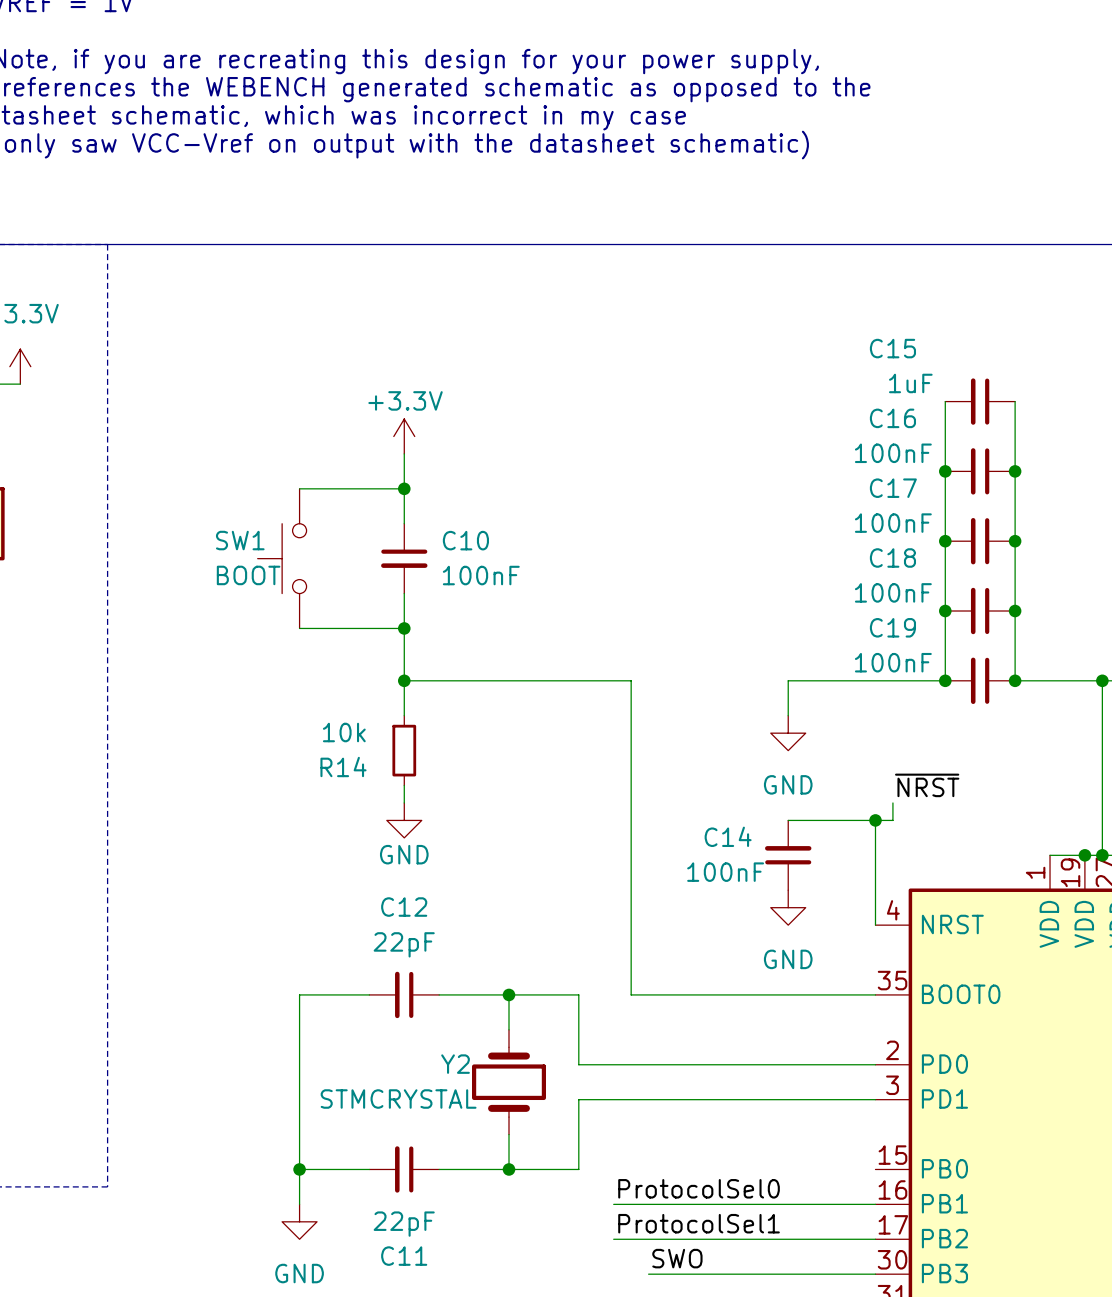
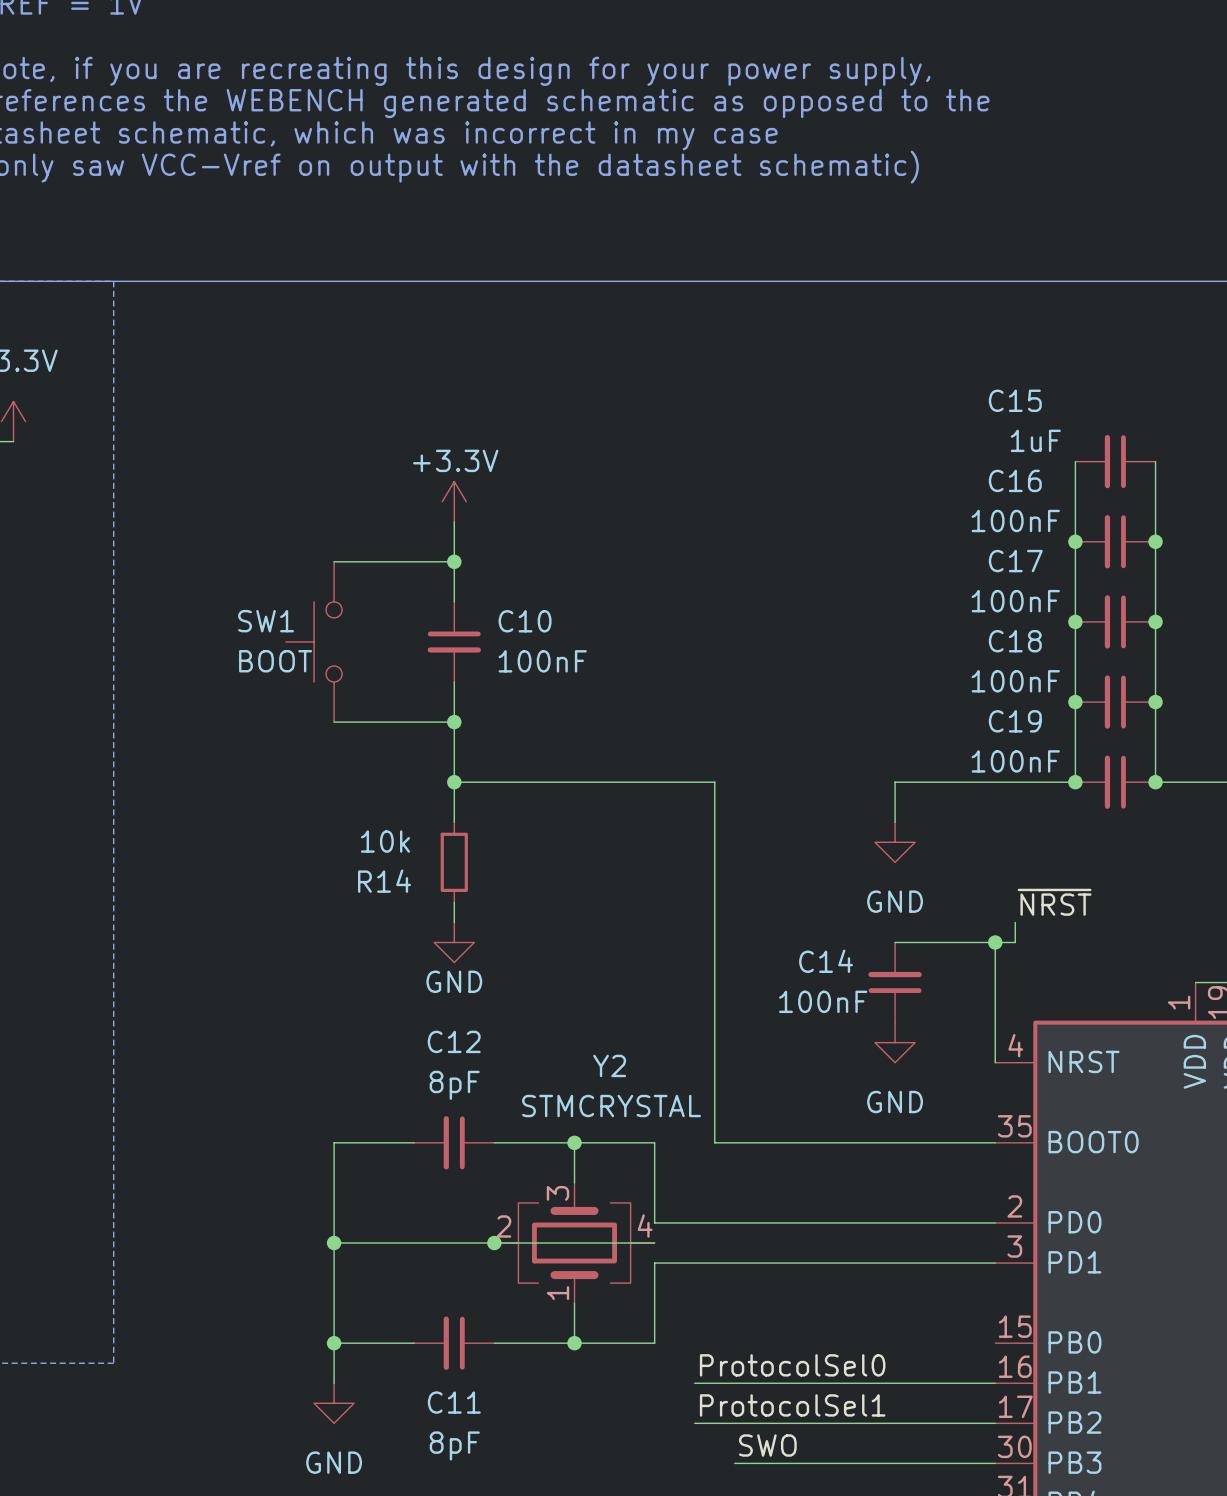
C12 value: 22pF (404, 944) -> 8pF (454, 1085)
Y2 symbol: [472, 1029, 546, 1135] -> [494, 1182, 655, 1304]
Y2 name position: Y2 (455, 1064) -> Y2 (609, 1065)
wire: none -> (334, 1243) (654, 1243)
junction: none -> (334, 1243)
junction: none -> (494, 1243)
Y2 value position: STMCRYSTAL (398, 1099) -> STMCRYSTAL (611, 1106)
C11 value: 22pF (404, 1224) -> 8pF (454, 1445)
C11 name position: C11 (404, 1256) -> C11 (454, 1402)

